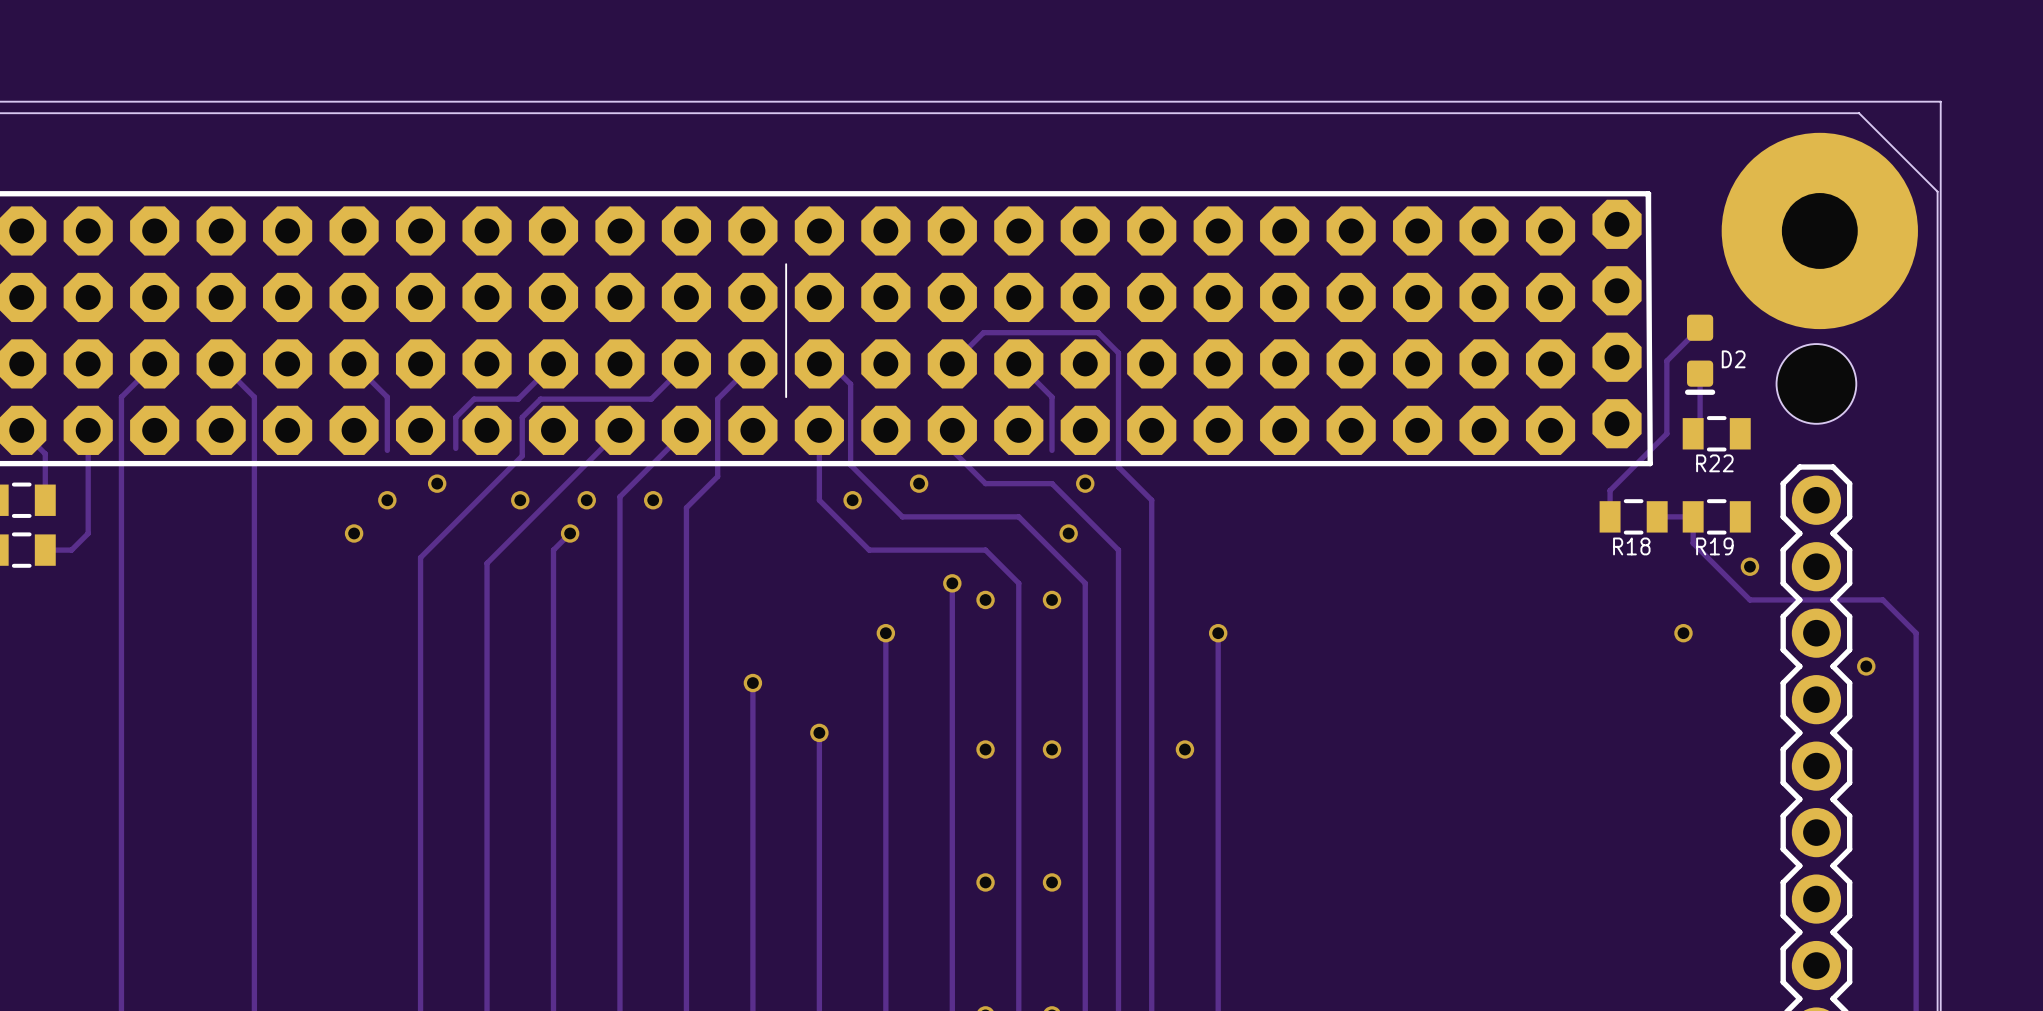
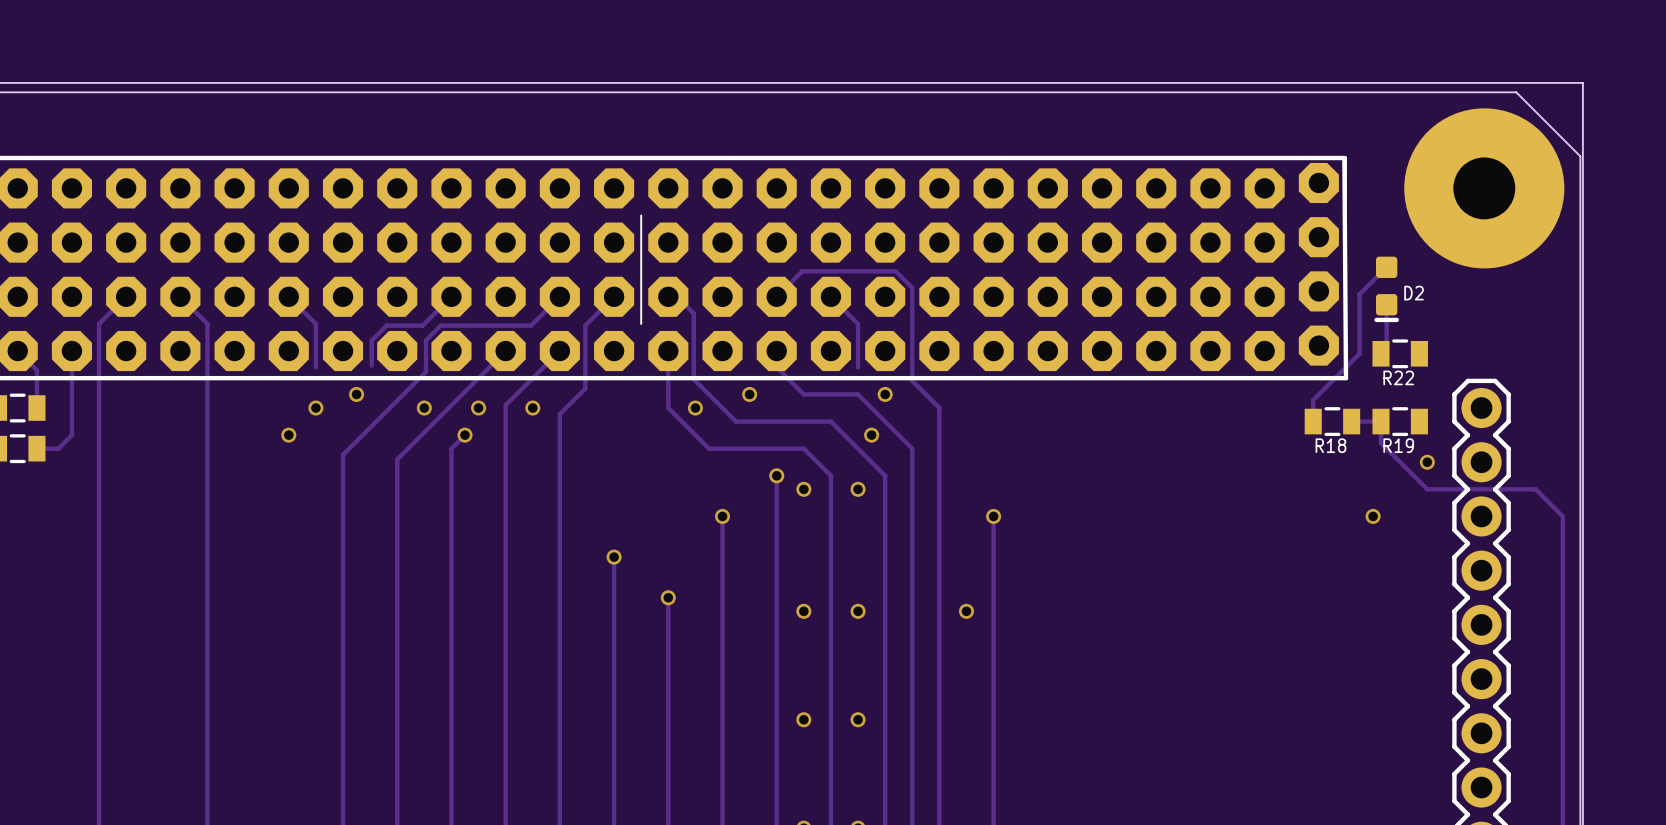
hole: (1816, 383) -> none
via: (1866, 666) -> none

